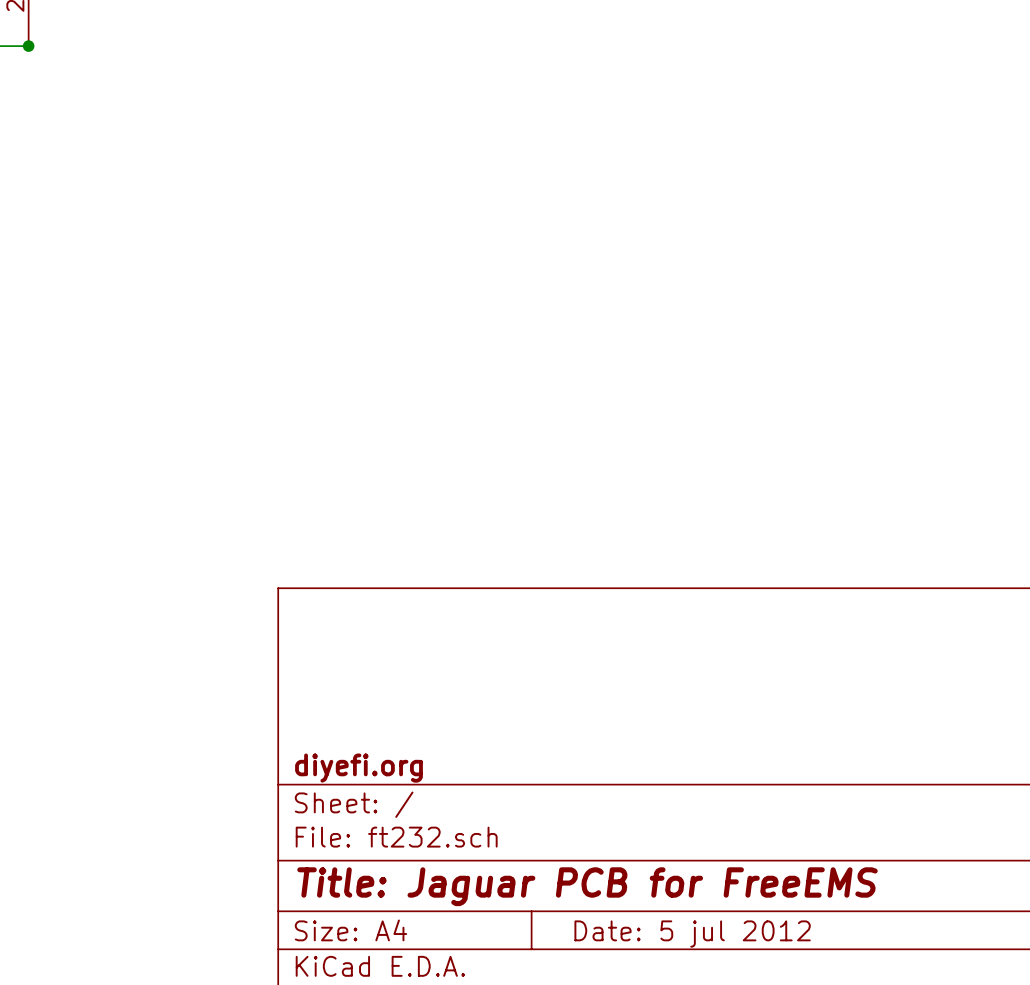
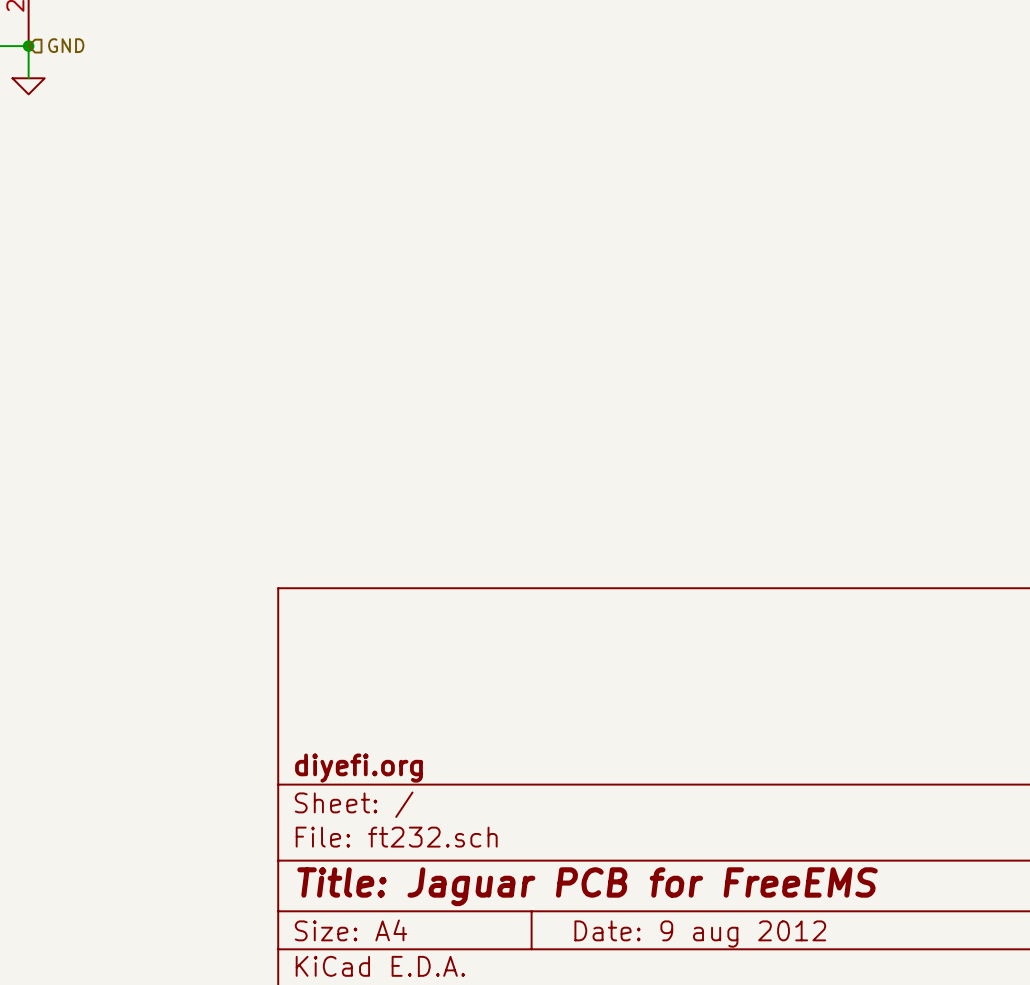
hierarchical label: none -> GND (66, 45)
wire: none -> (28, 46) (28, 78)
power symbol: none -> (28, 86)
title block: Date: 5 jul 2012 (692, 934) -> Date: 9 aug 2012 (700, 934)

